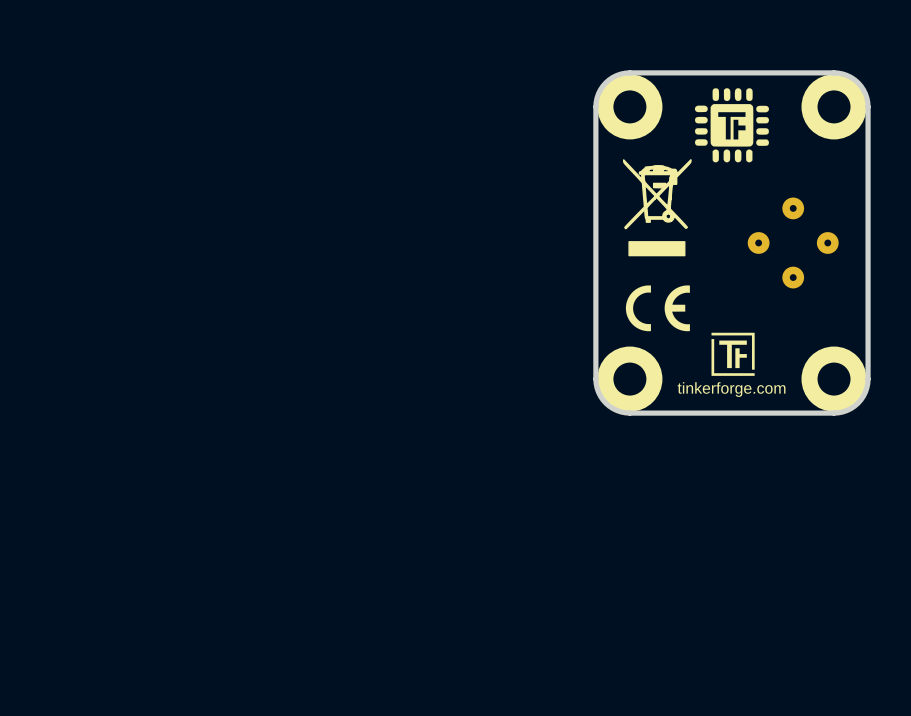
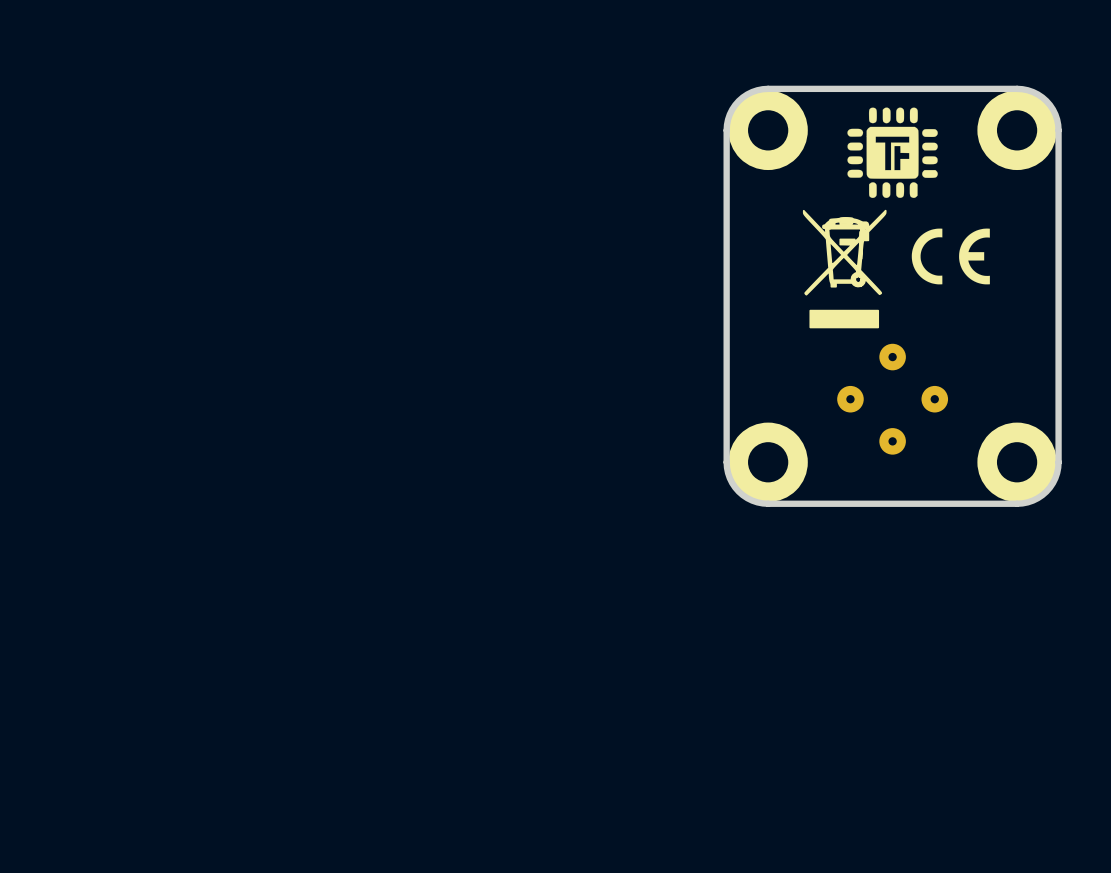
drawing position: (657, 207) -> (844, 269)
part position: (793, 242) -> (892, 399)
drawing position: (657, 308) -> (950, 256)
drawing: [711, 332, 755, 376] -> none
text: tinkerforge.com (731, 389) -> none

